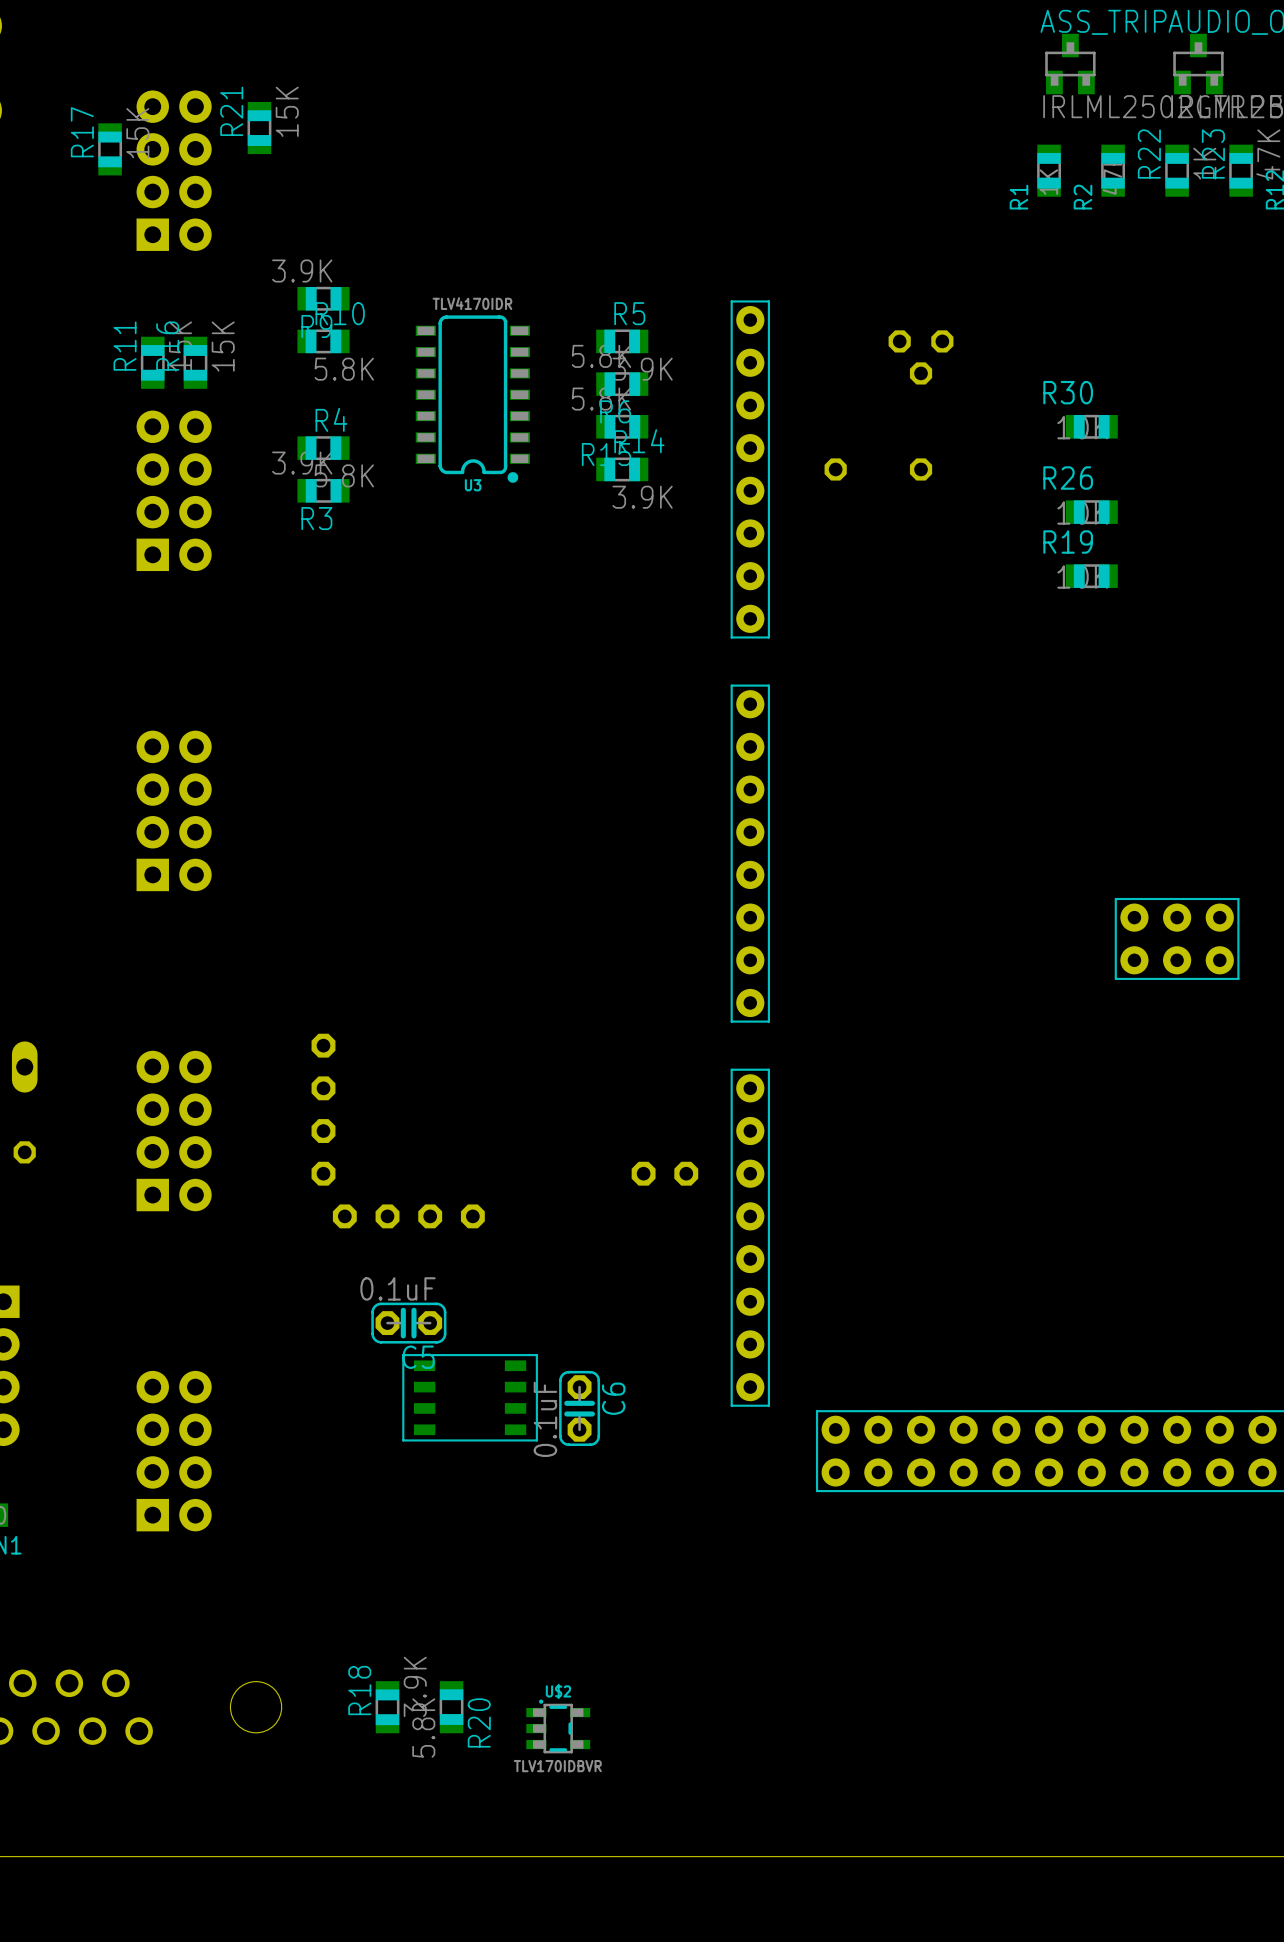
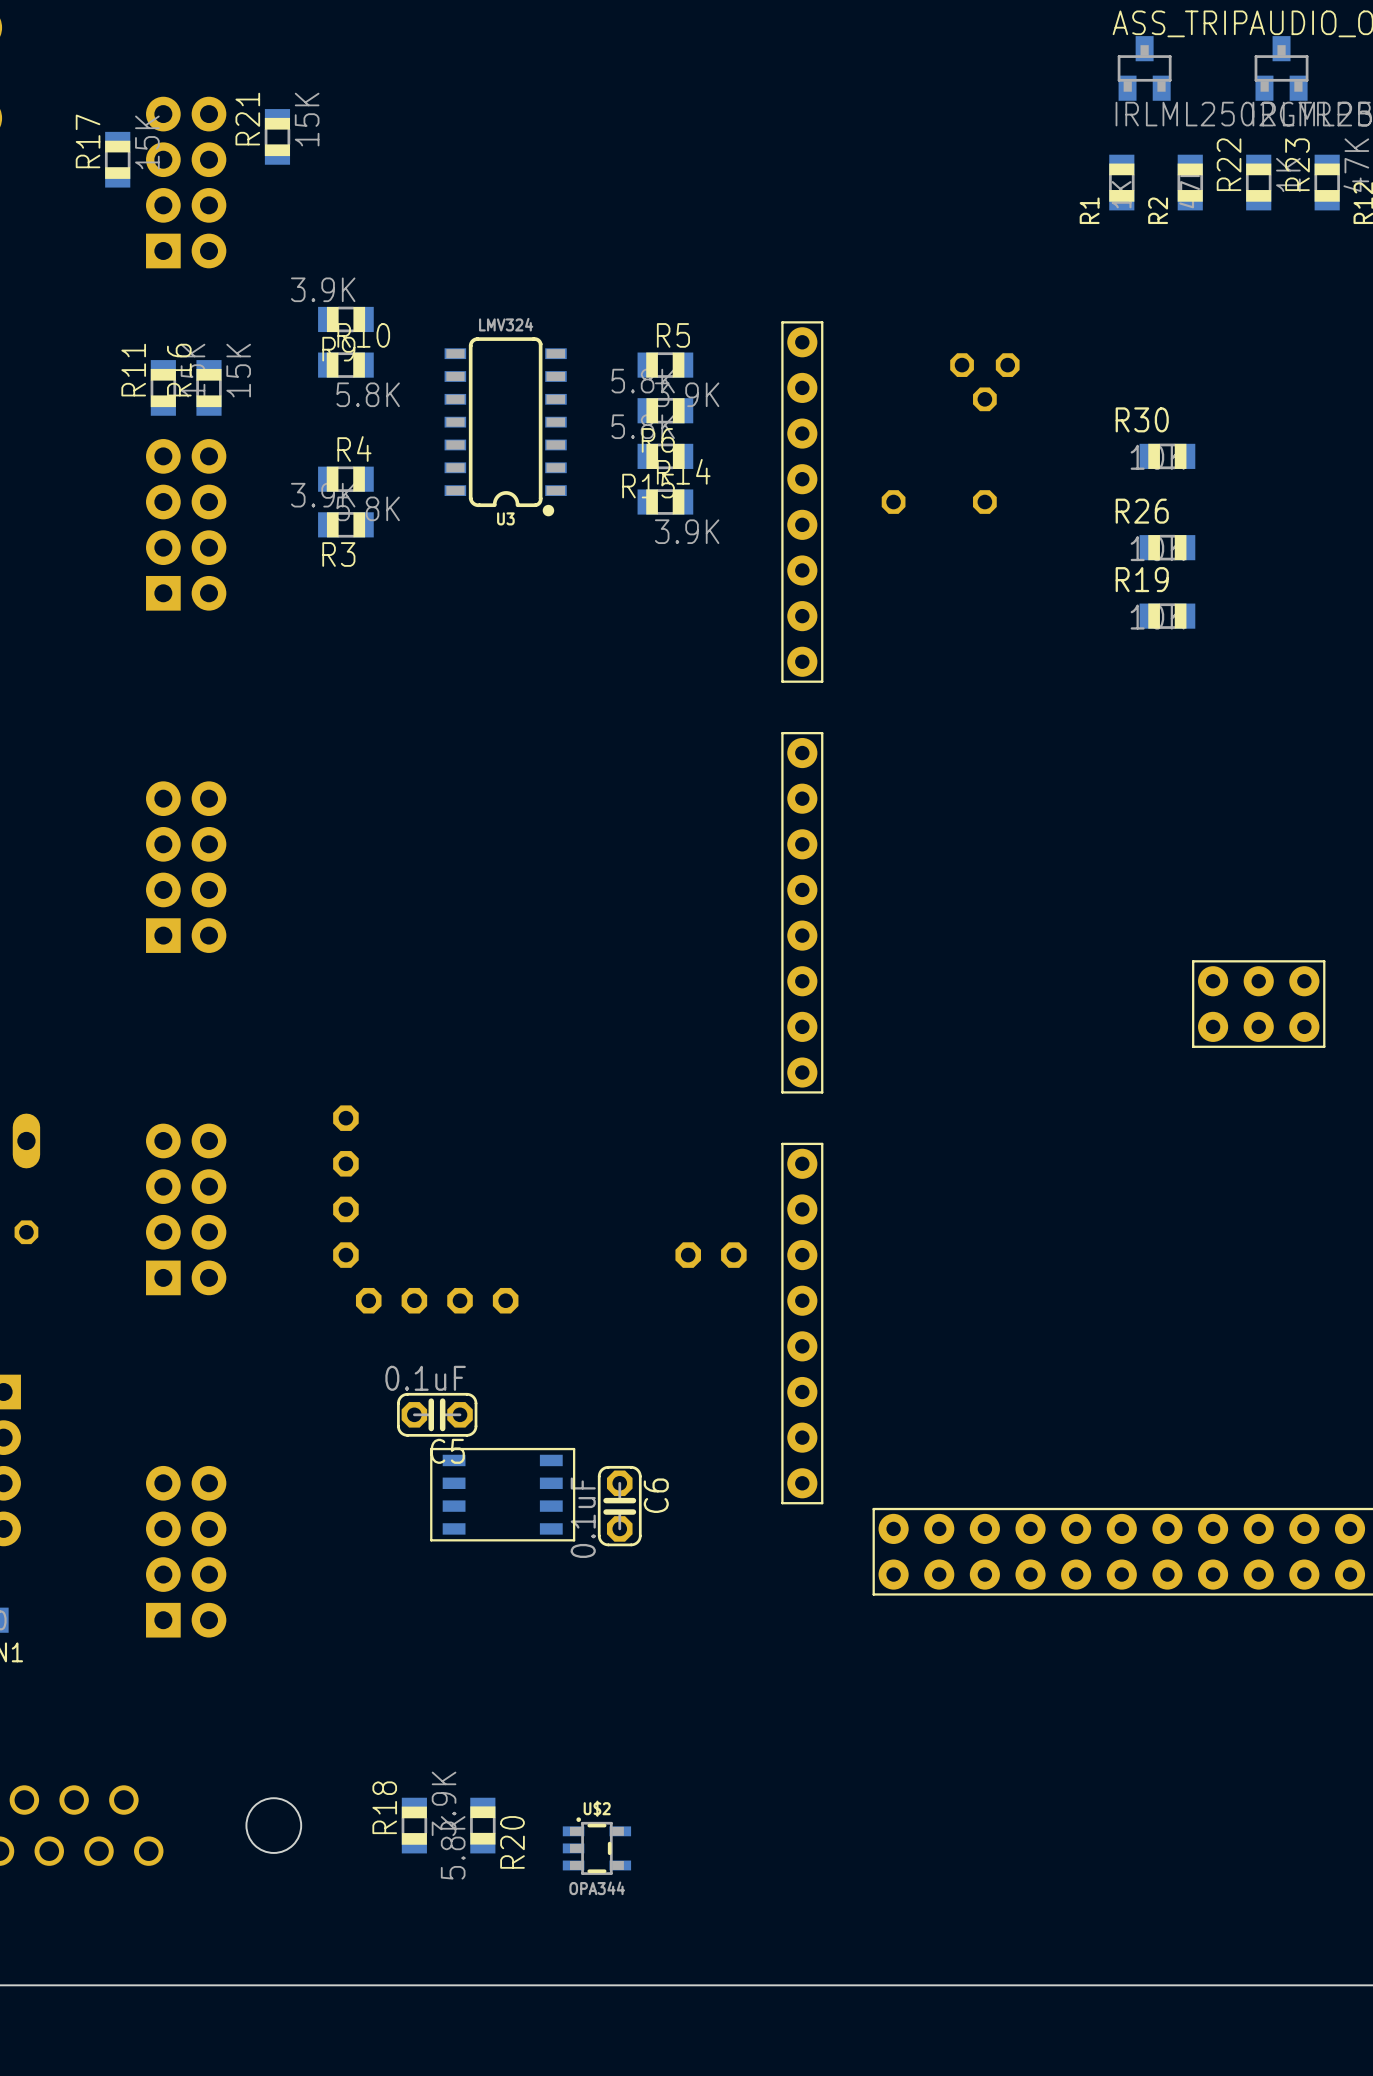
U3 value: TLV4170IDR (472, 303) -> LMV324 (506, 324)
U$2 value: TLV170IDBVR (557, 1766) -> OPA344 (597, 1888)

